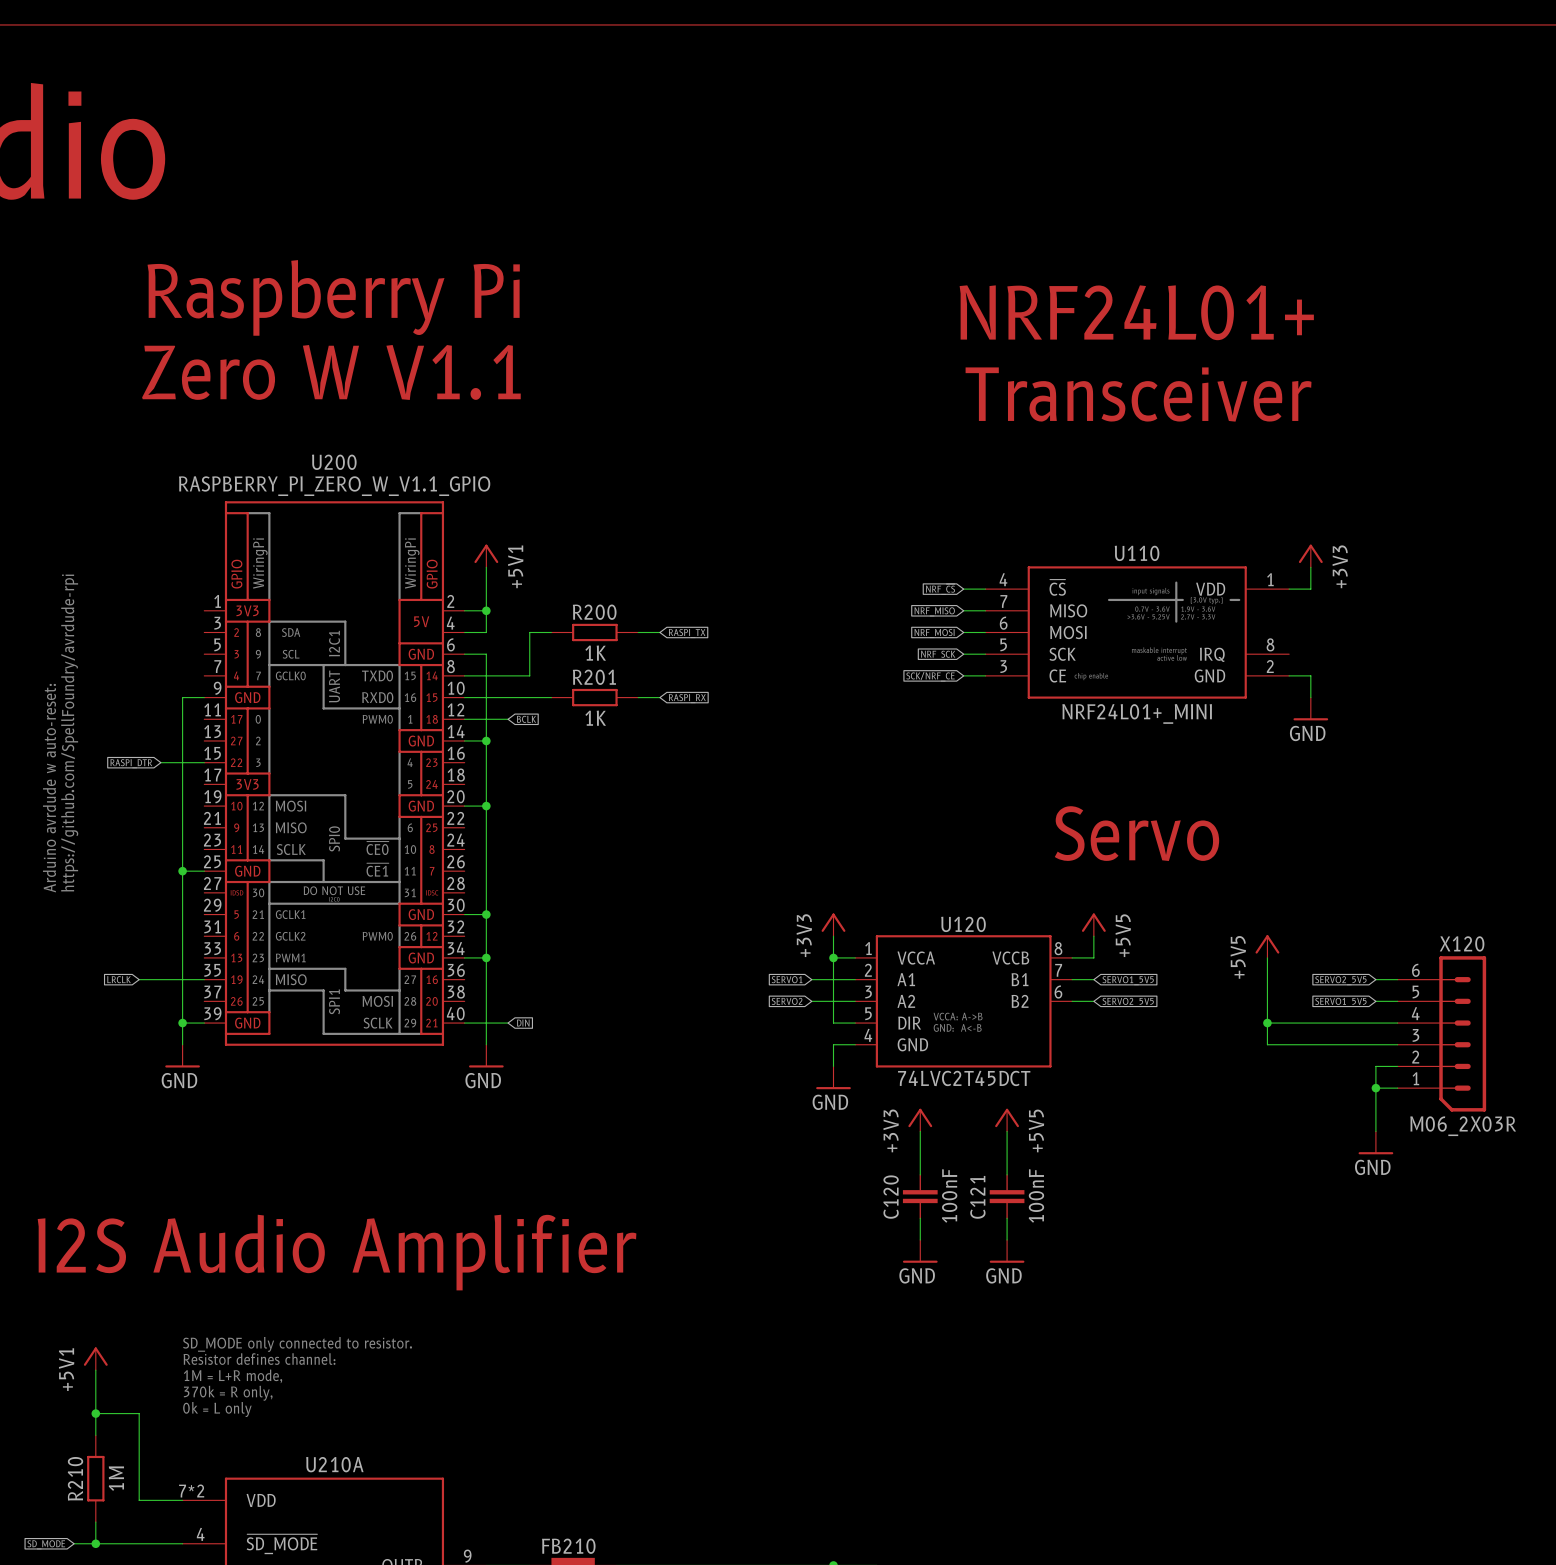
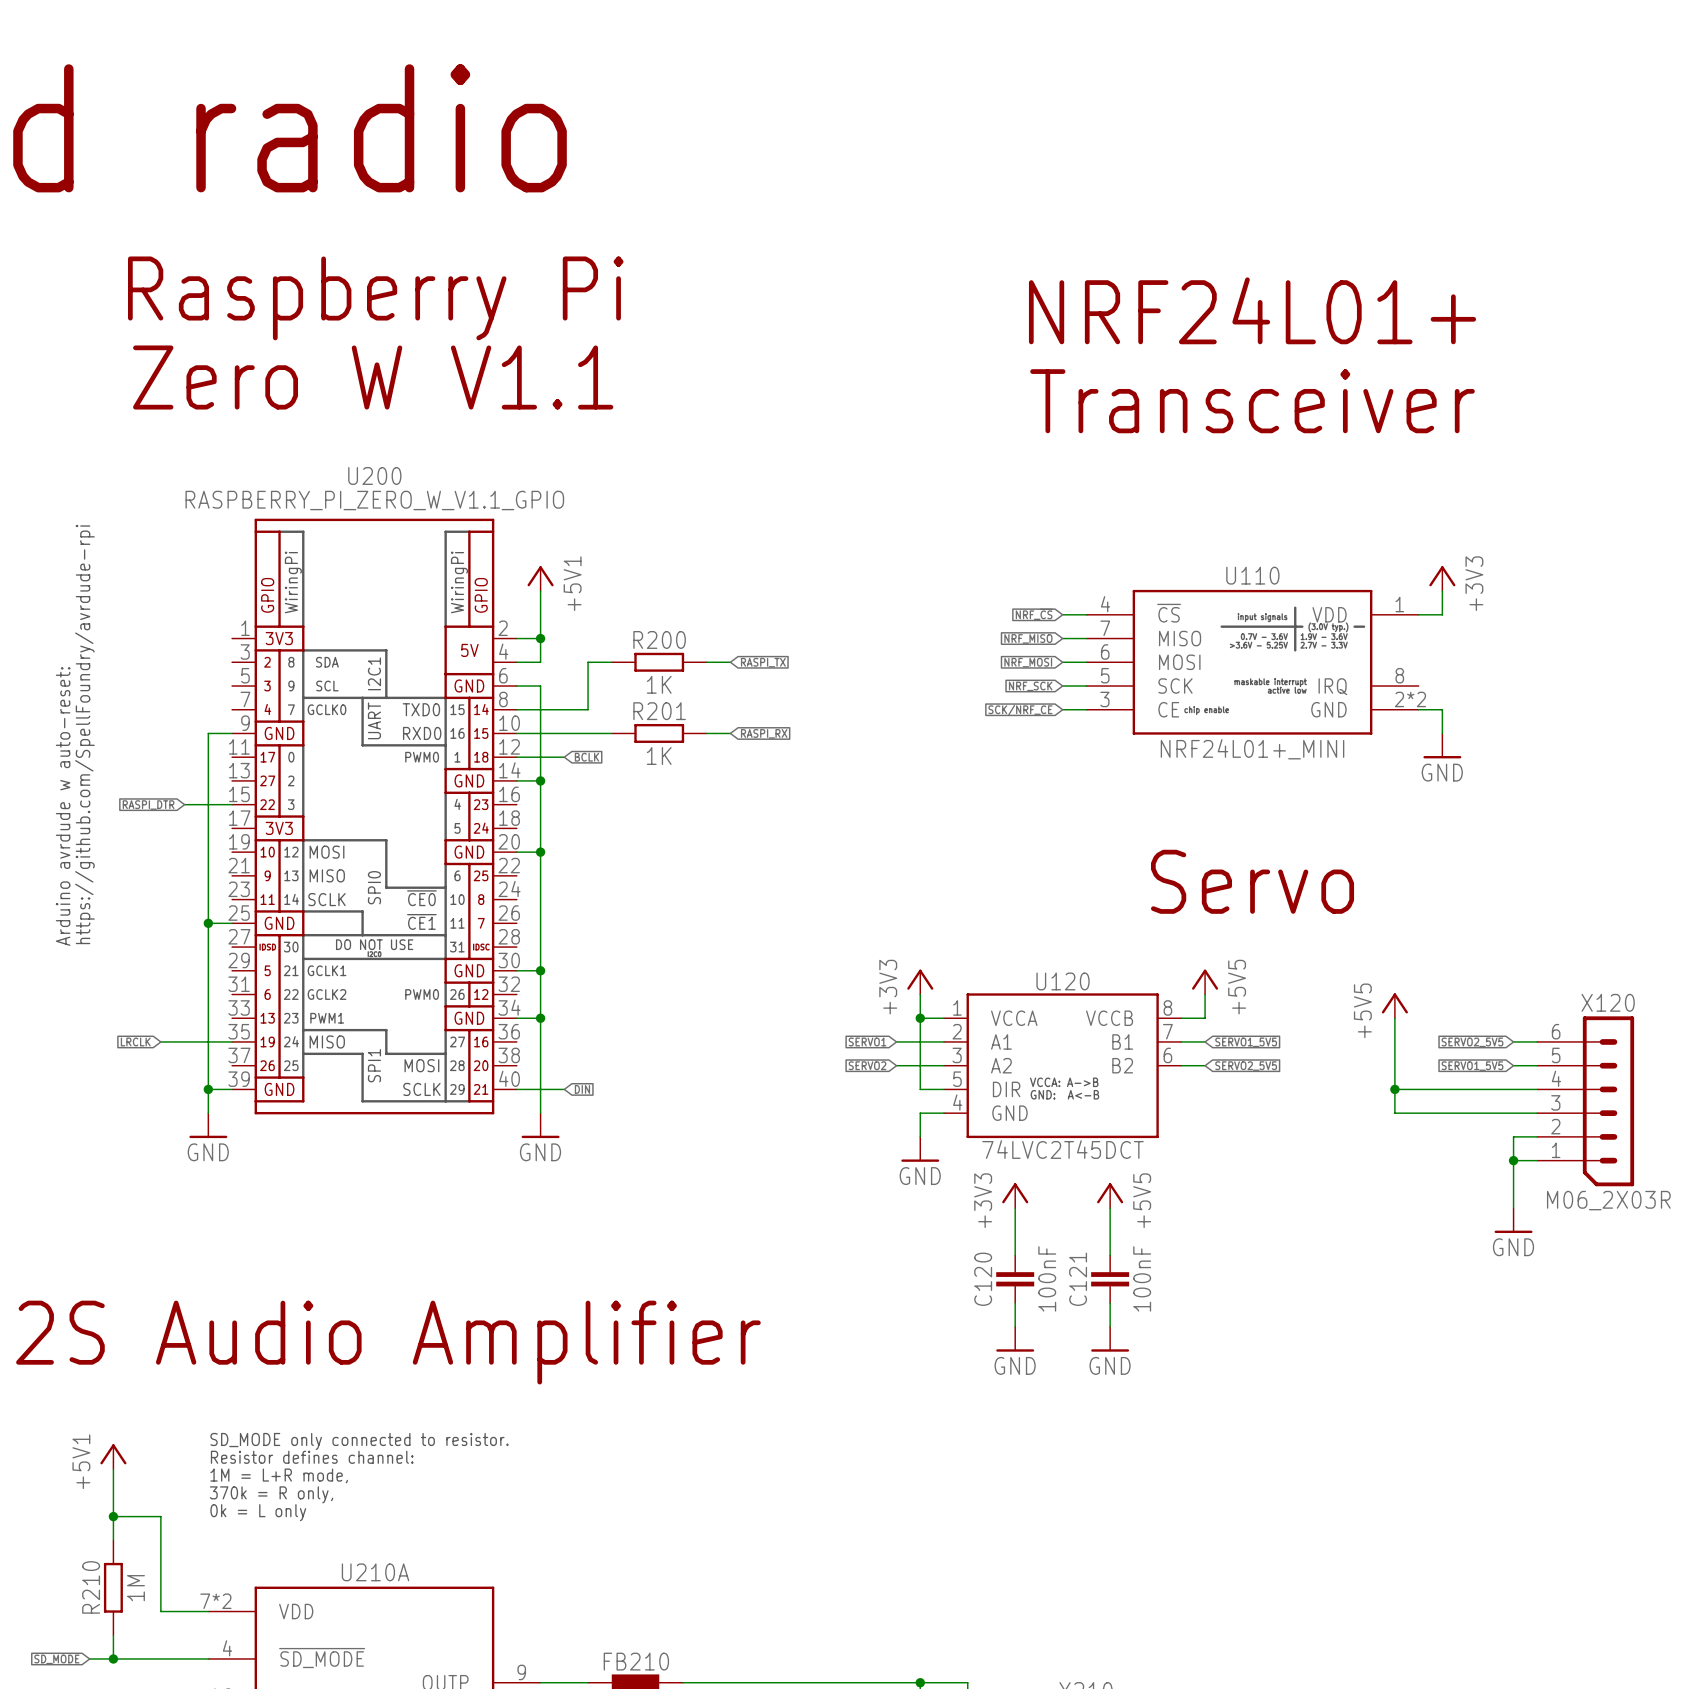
U110 pin number: 2 (1270, 666) -> 2*2 (1410, 699)

